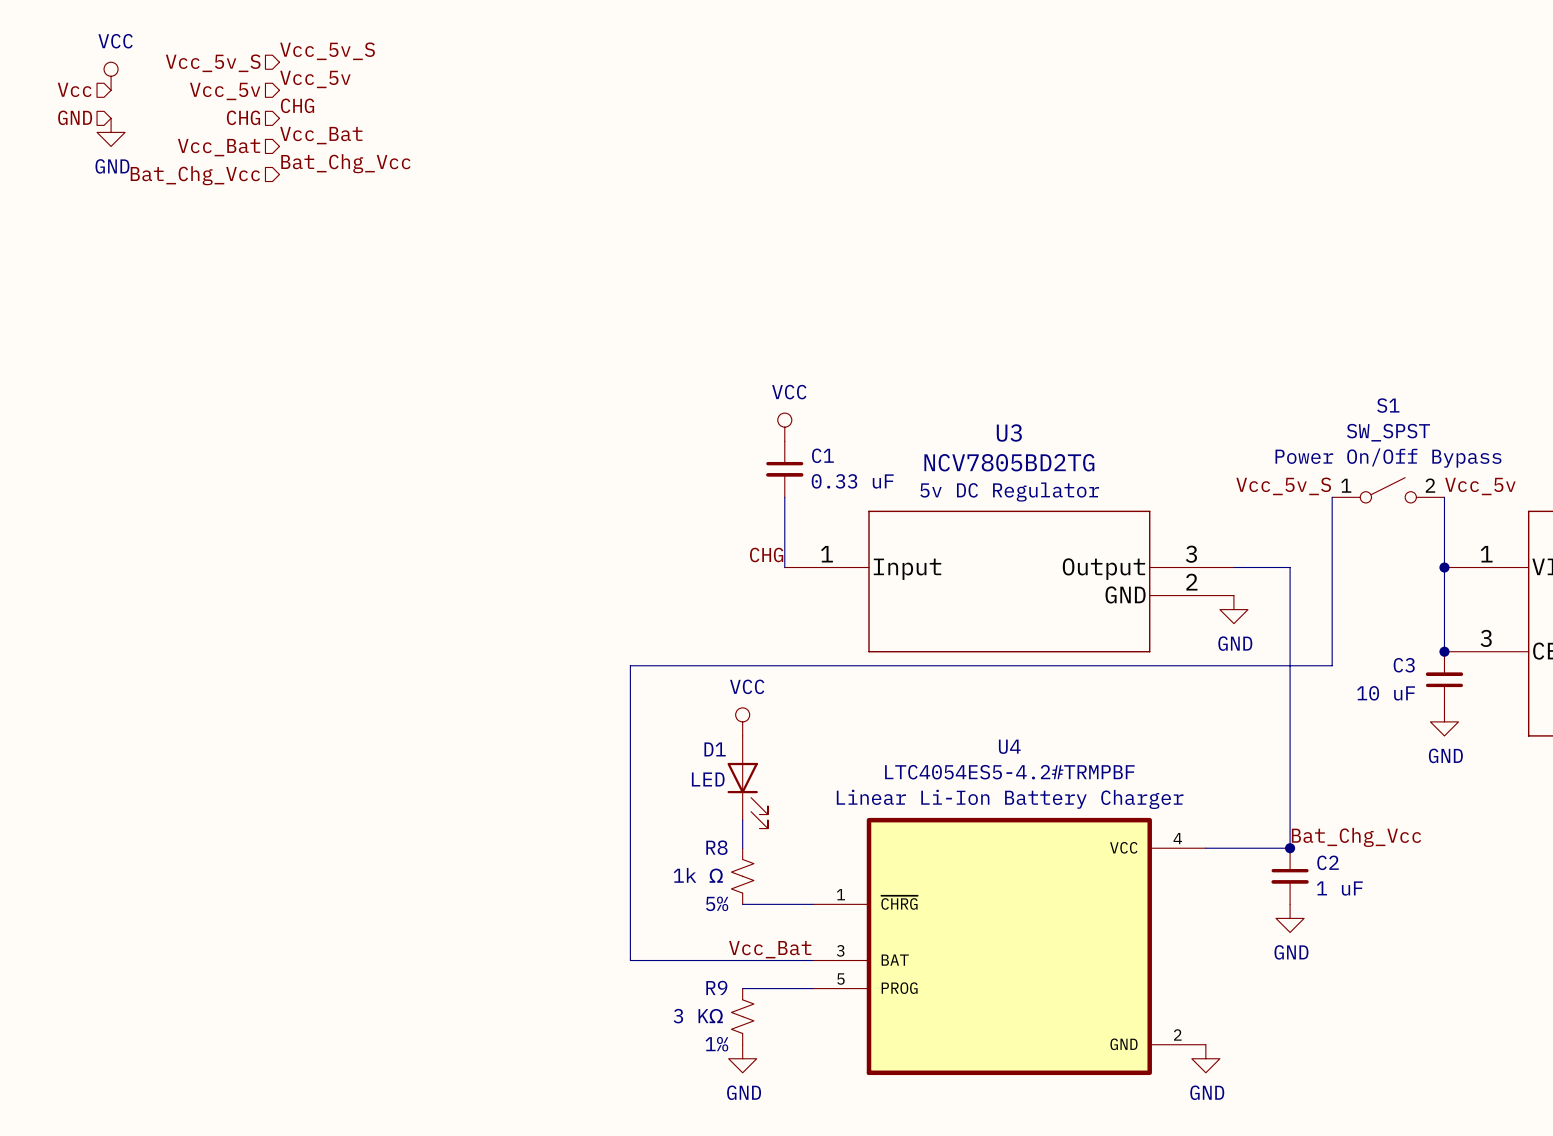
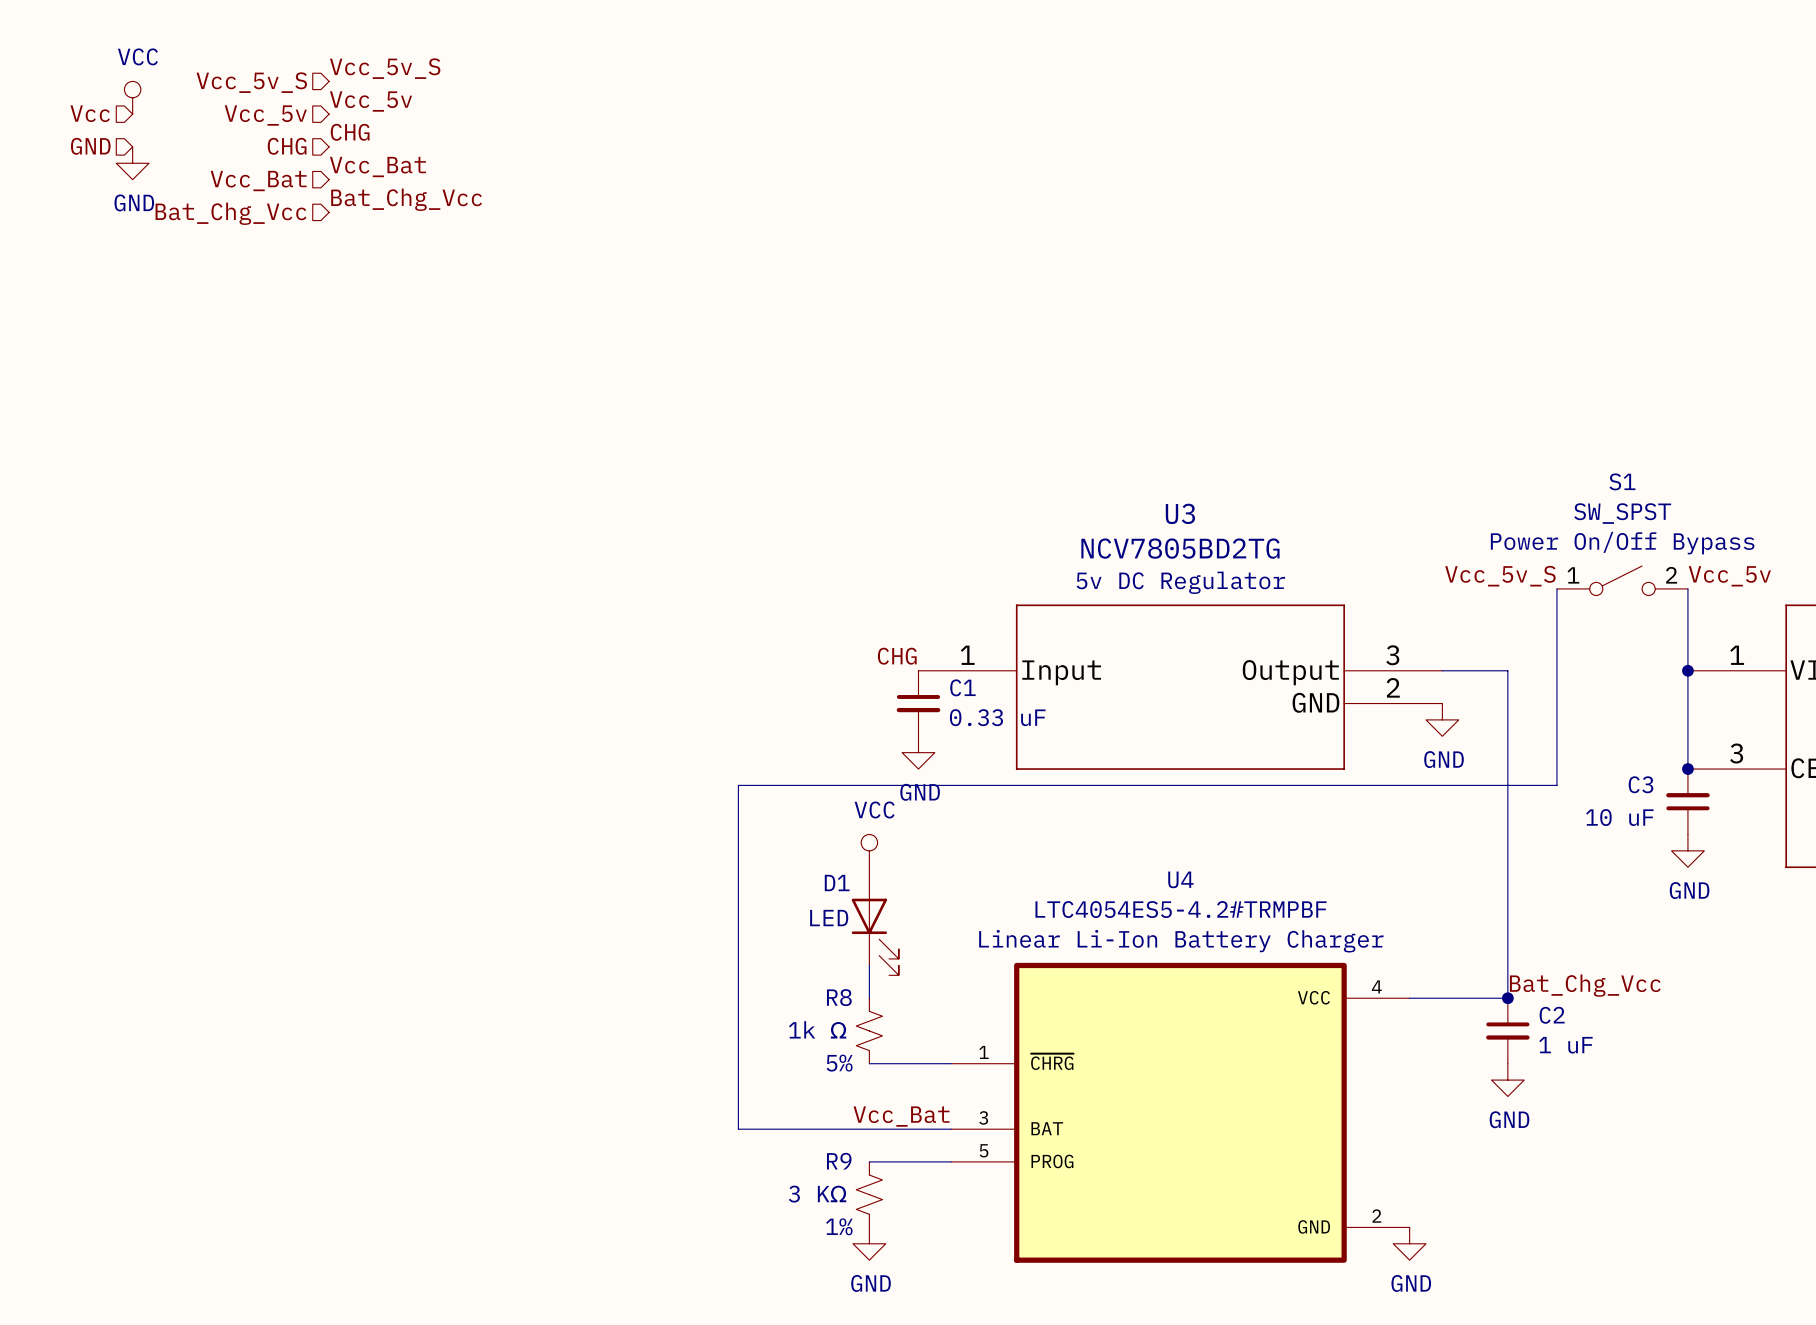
power symbol: VCC (784, 427) -> none
C1 position: (784, 469) -> (918, 703)
wire: (784, 497) (784, 567) -> none
power symbol: none -> GND (918, 752)

